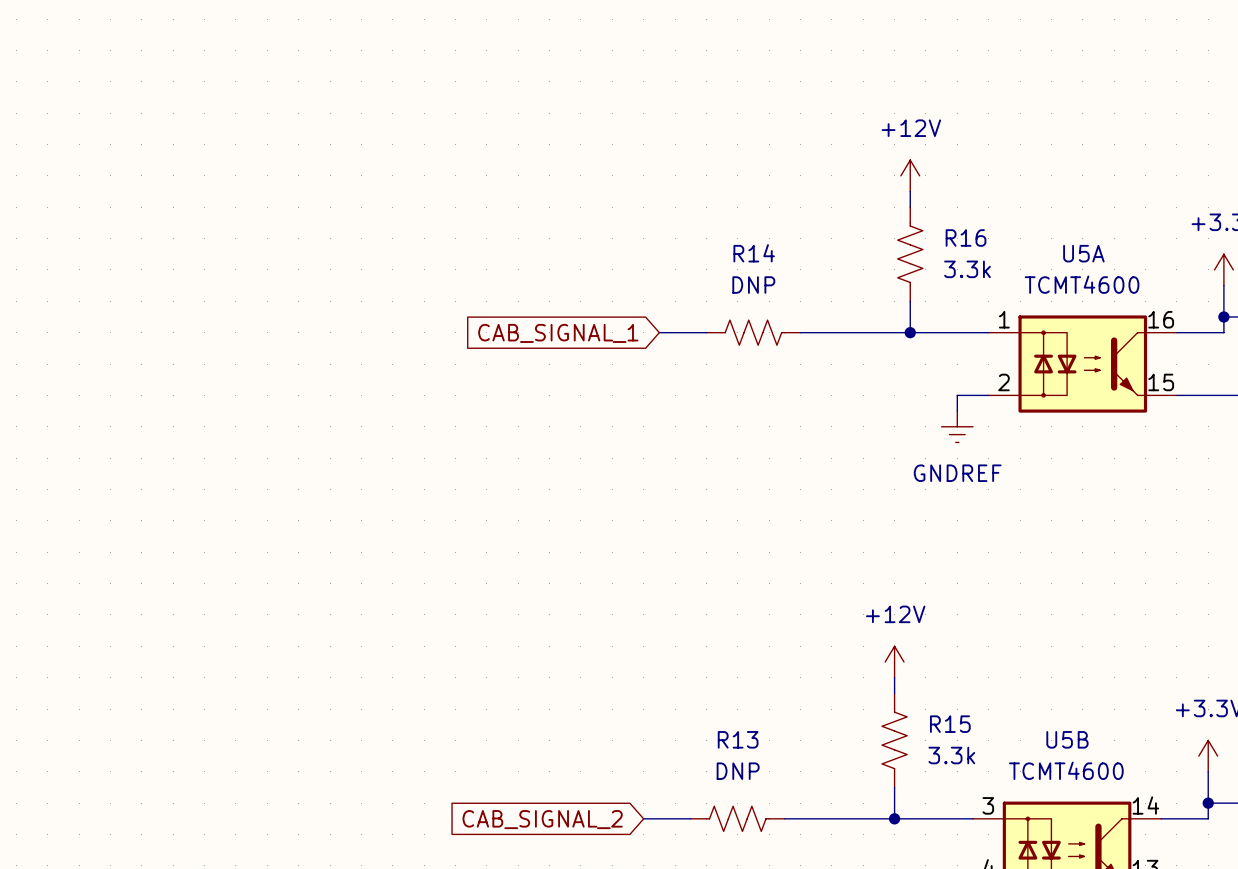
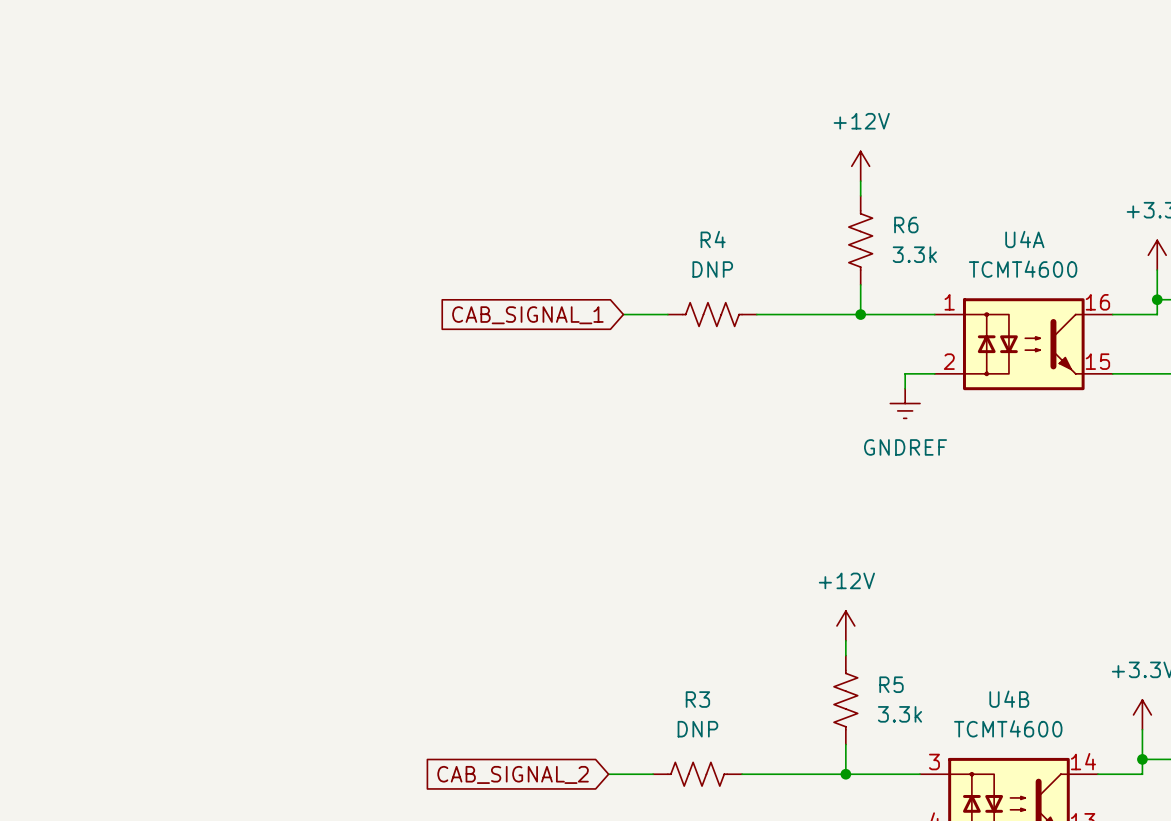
R16 name: R16 (966, 237) -> R6 (906, 225)
R14 name: R14 (754, 253) -> R4 (713, 239)
U5A name: U5A (1083, 253) -> U4A (1024, 239)
R15 name: R15 (950, 724) -> R5 (891, 684)
R13 name: R13 (738, 739) -> R3 (697, 699)
U5B name: U5B (1067, 739) -> U4B (1009, 699)

